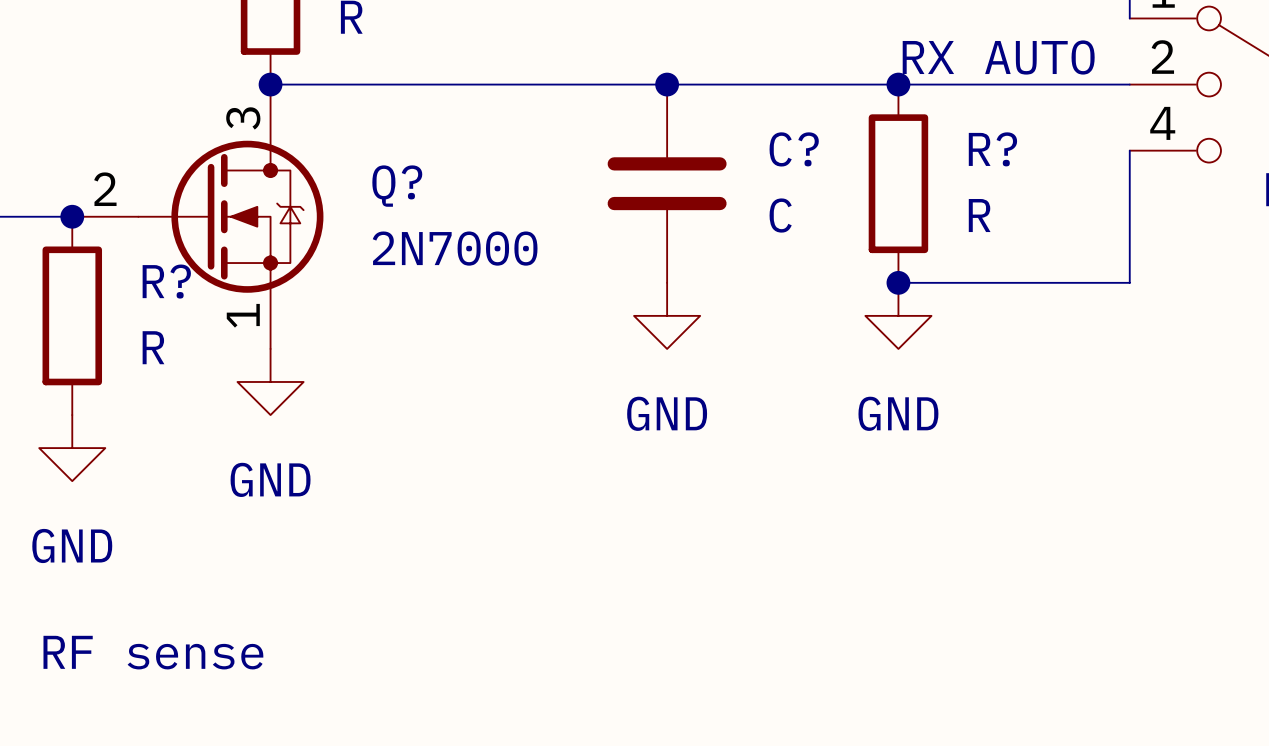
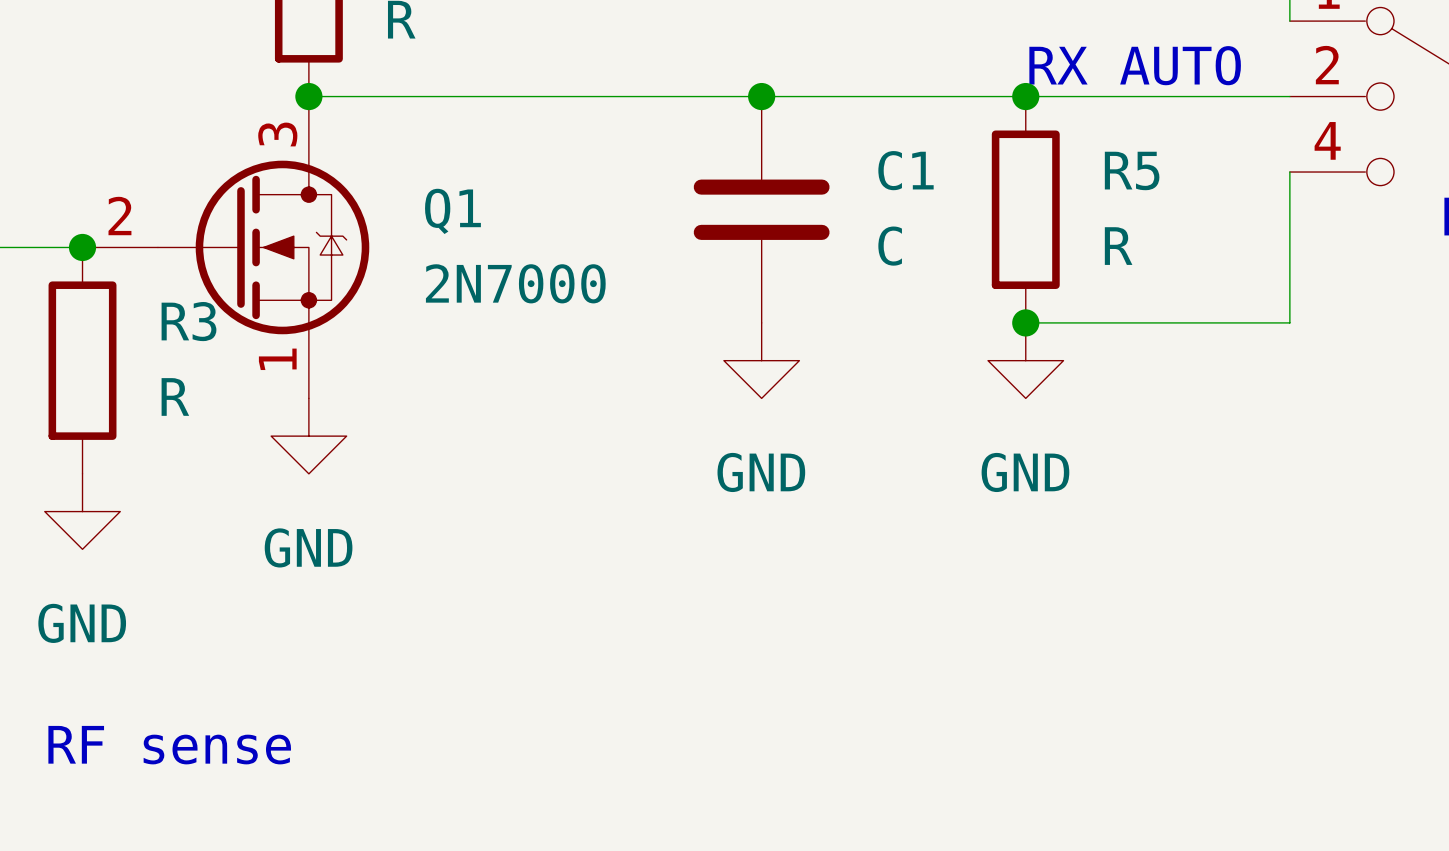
C? name: C? (794, 149) -> C1 (906, 170)
R? name: R? (992, 149) -> R5 (1132, 170)
Q? name: Q? (397, 186) -> Q1 (452, 211)
R? name: R? (166, 281) -> R3 (188, 321)

